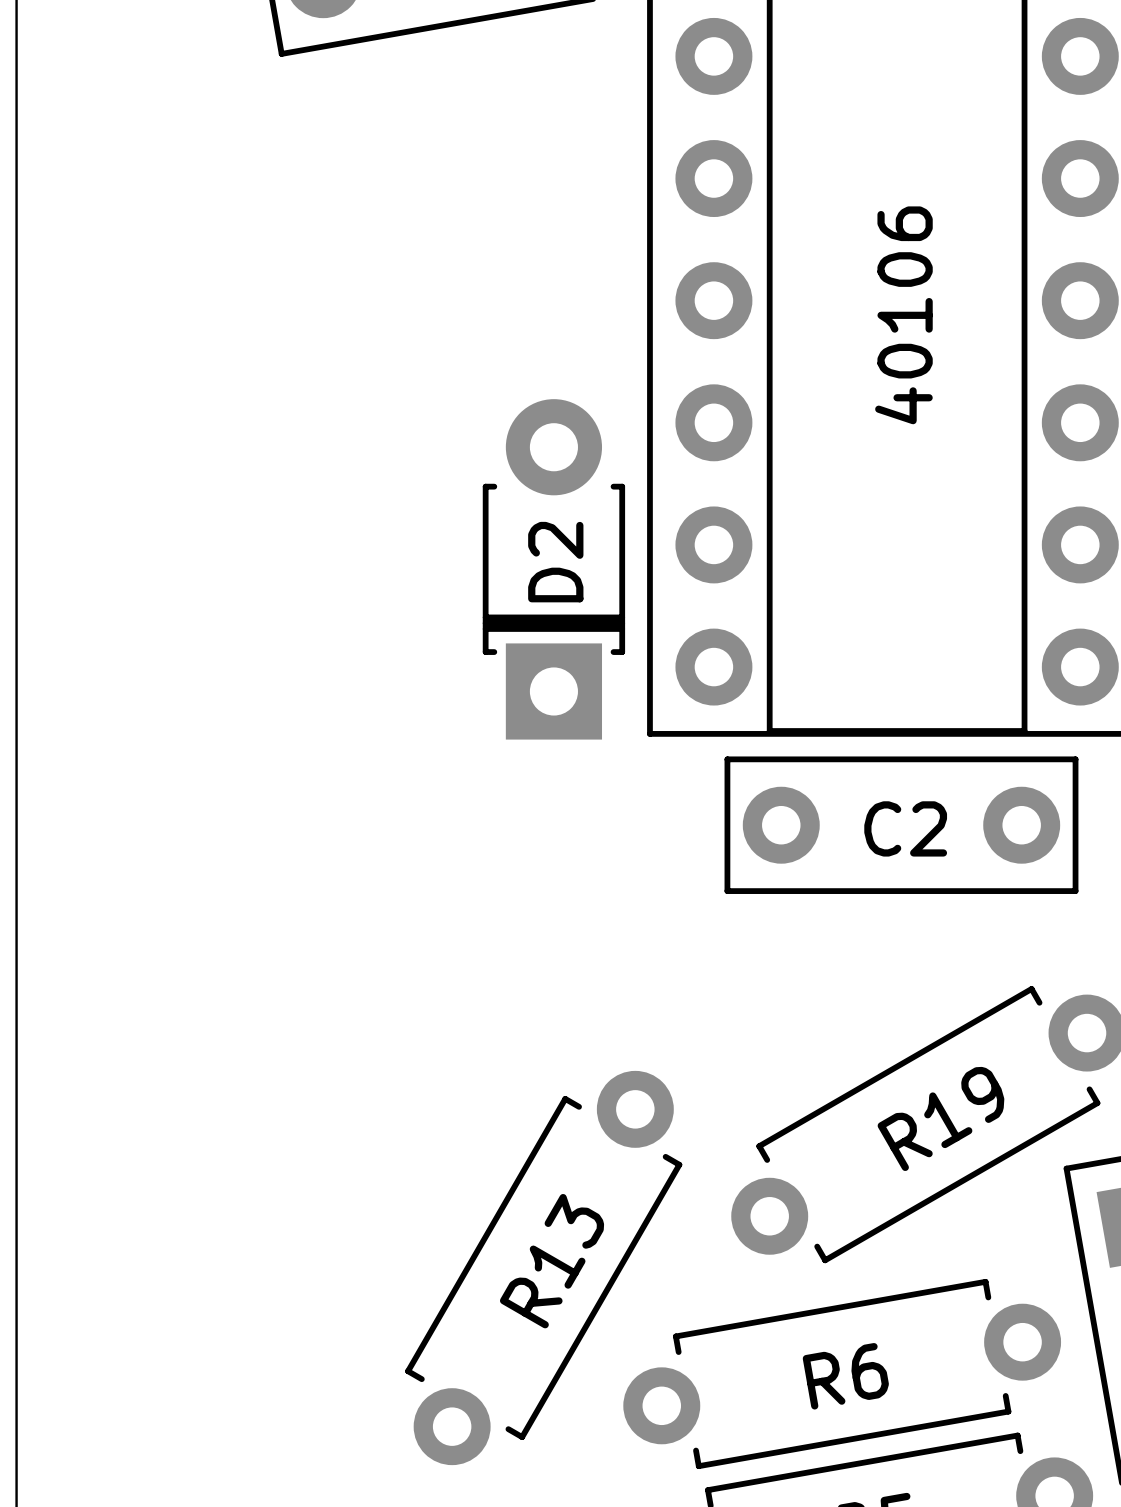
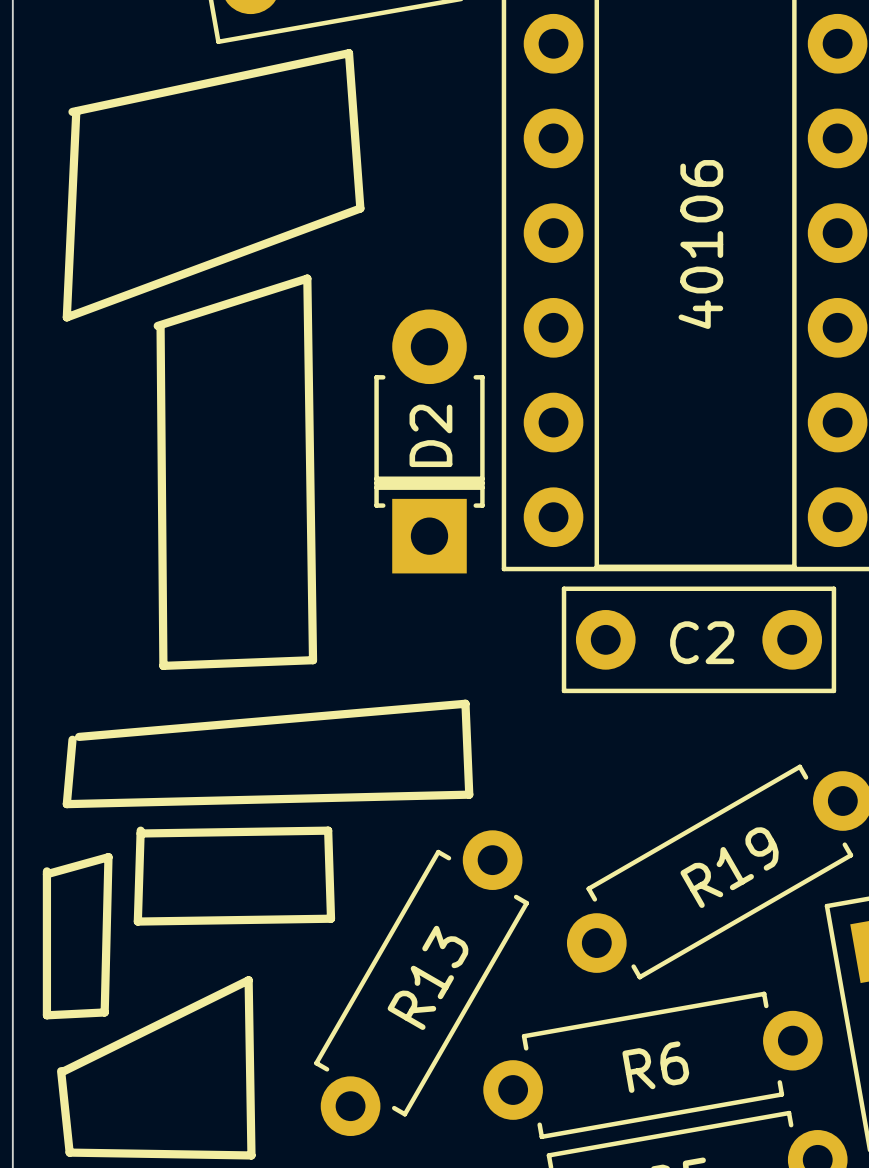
line: none -> (72, 111) (349, 53) (360, 208) (66, 317) (76, 111)
line: none -> (157, 325) (307, 278) (313, 660) (163, 665) (160, 325)
line: none -> (79, 736) (465, 703) (469, 794) (66, 804) (72, 739)
line: none -> (140, 830) (137, 921) (331, 918) (328, 830) (140, 833)
line: none -> (46, 871) (46, 1015) (104, 1012) (108, 857) (46, 874)
line: none -> (61, 1071) (69, 1152) (251, 1155) (248, 980) (63, 1071)

